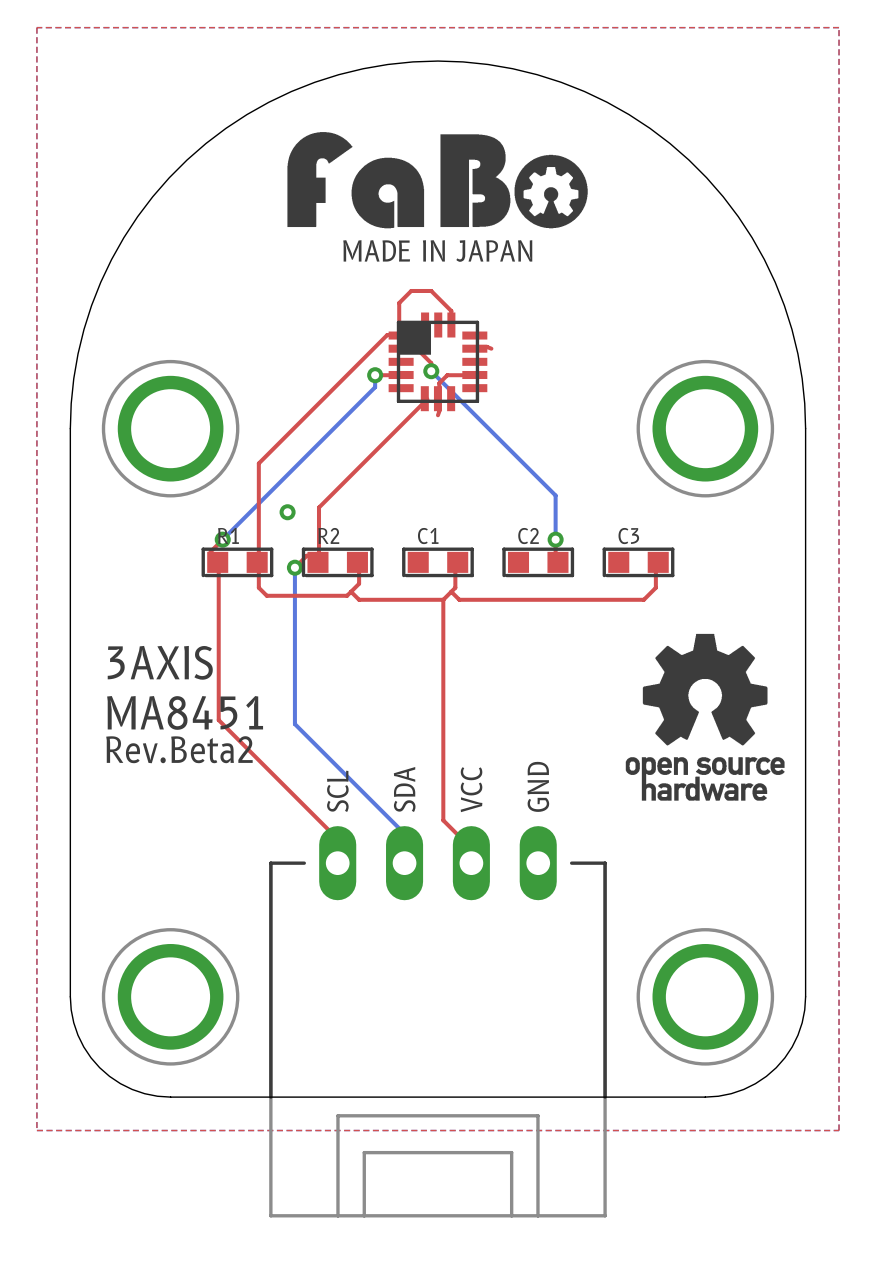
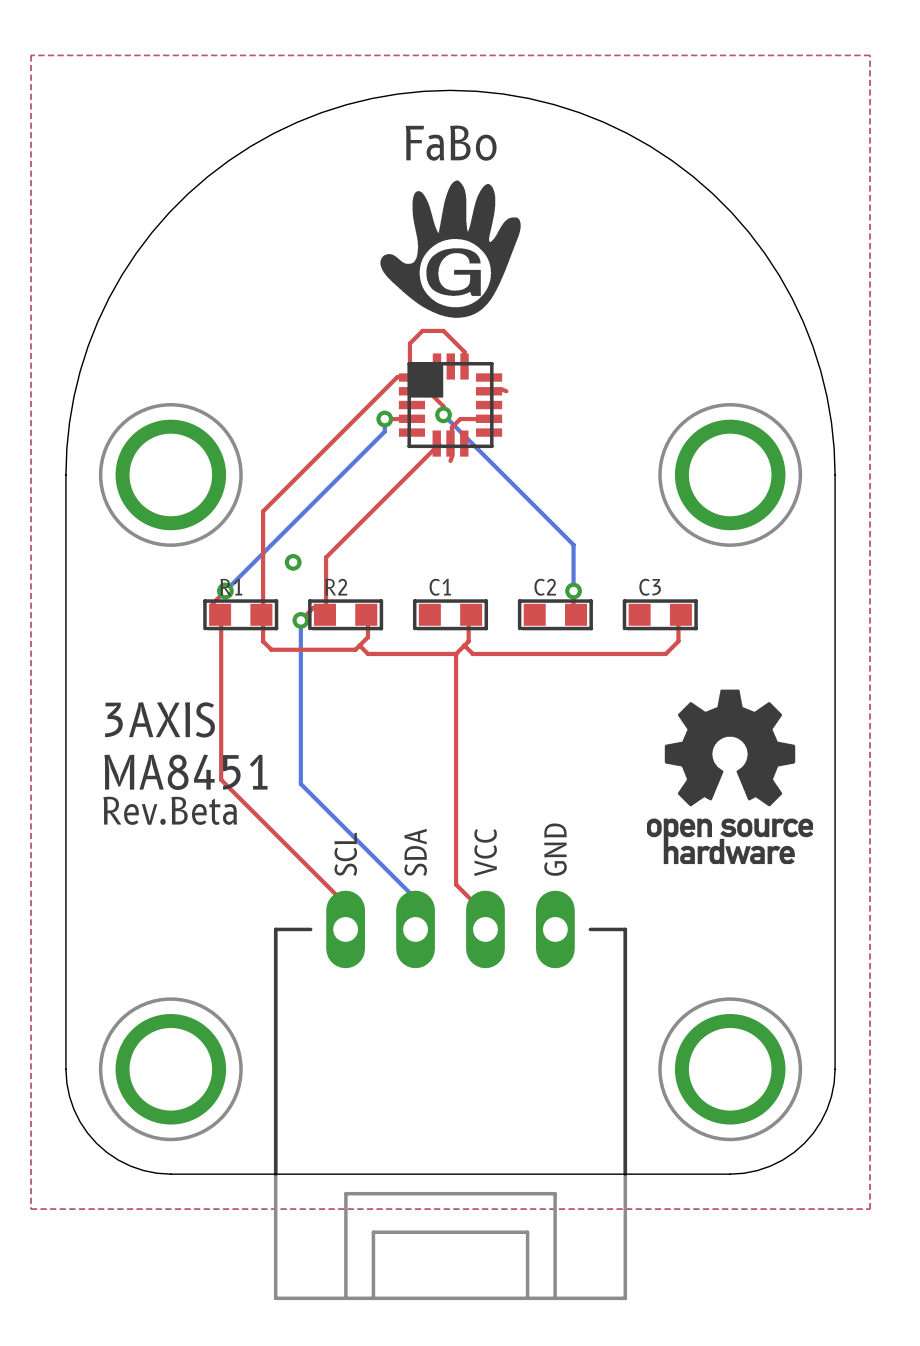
drawing: [287, 132, 588, 229] -> none
drawing: none -> [380, 180, 521, 318]
text: MADE IN JAPAN (437, 251) -> none
text: Rev.Beta2 (179, 749) -> Rev.Beta (170, 810)

